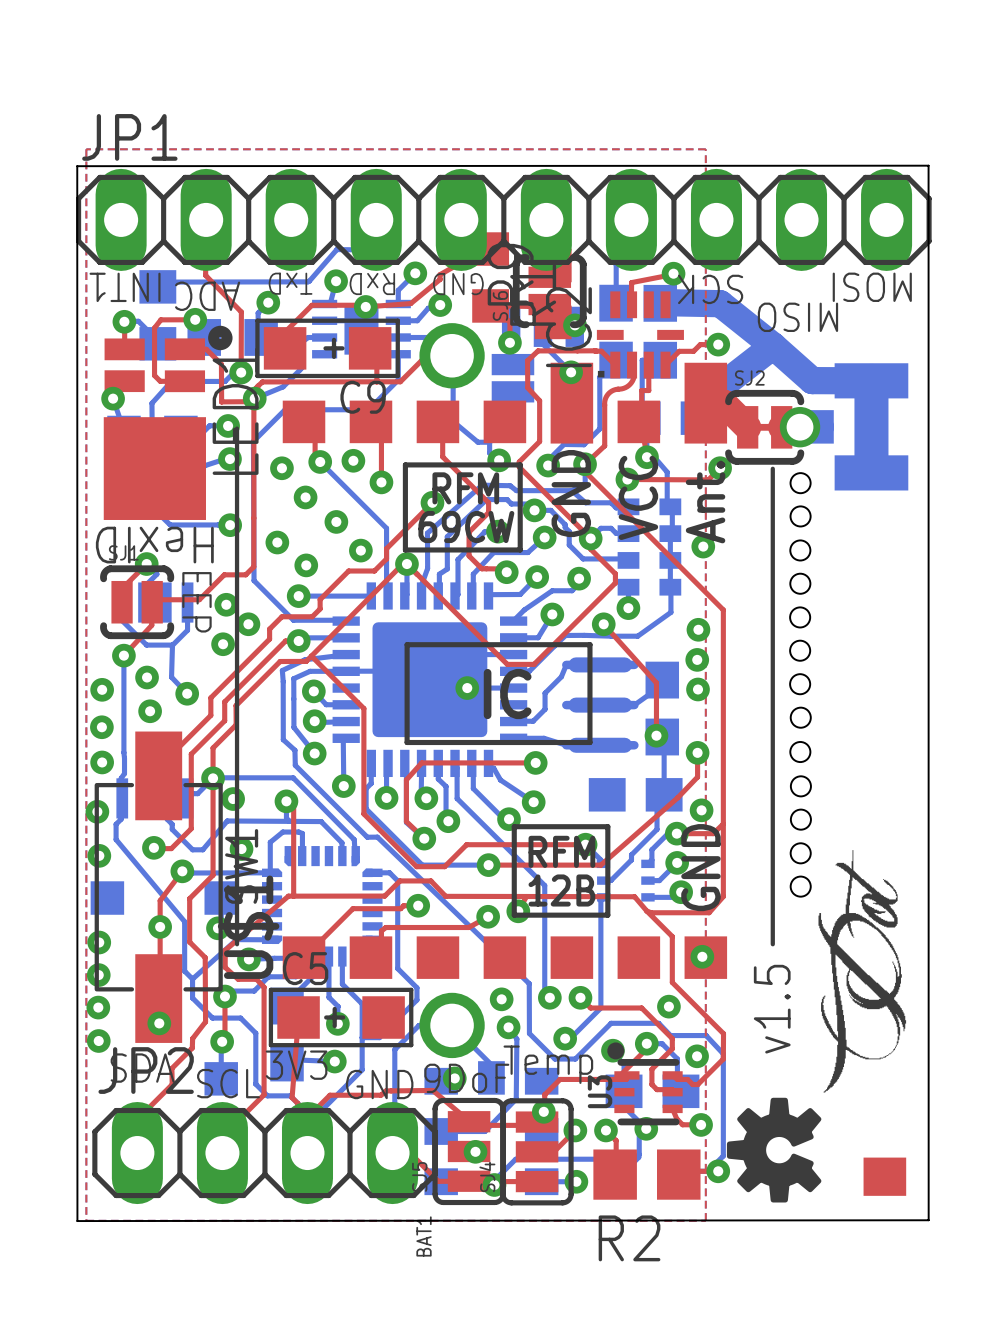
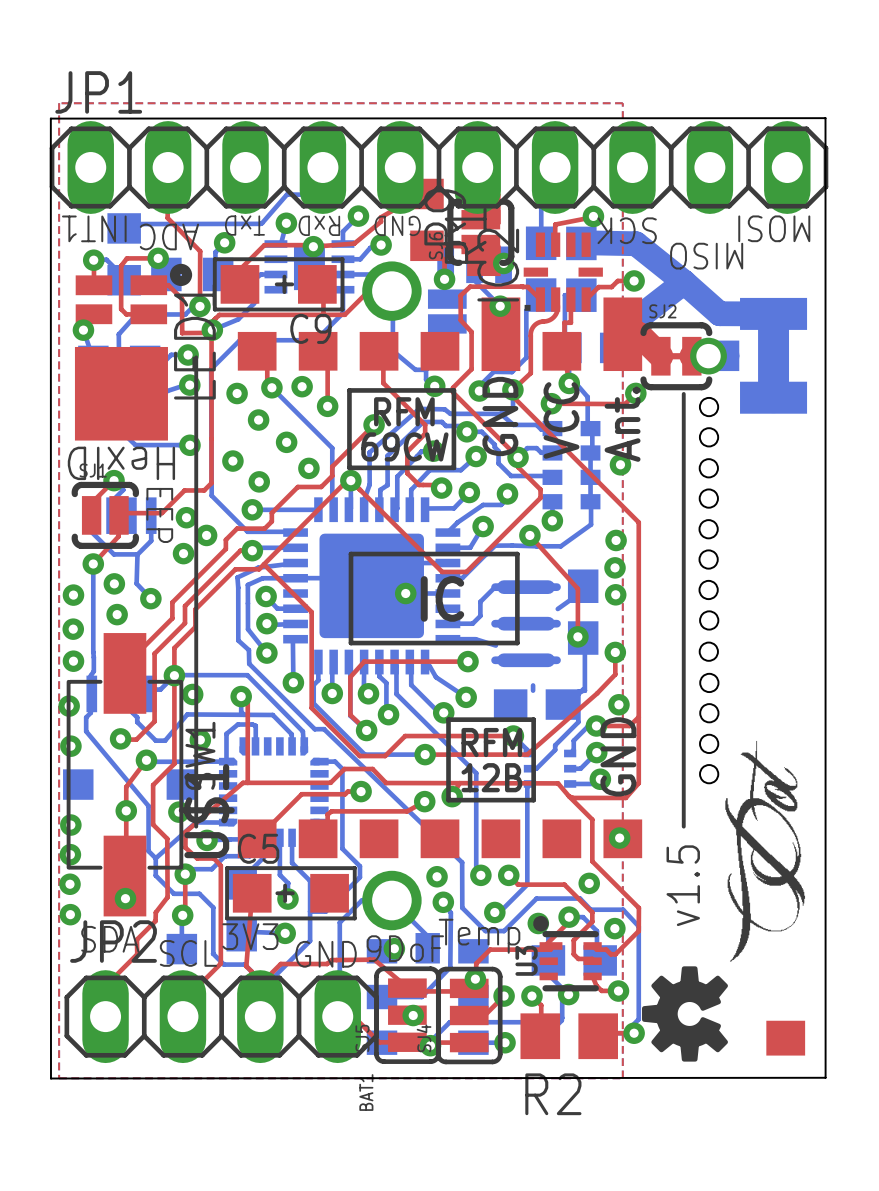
bottom track: (566, 664) (561, 676) (545, 693) (545, 709) (533, 721) -> (495, 587) (480, 601) (480, 615) (472, 623) (465, 623)
part position: (600, 705) -> (526, 623)
part position: (635, 794) -> (536, 704)

